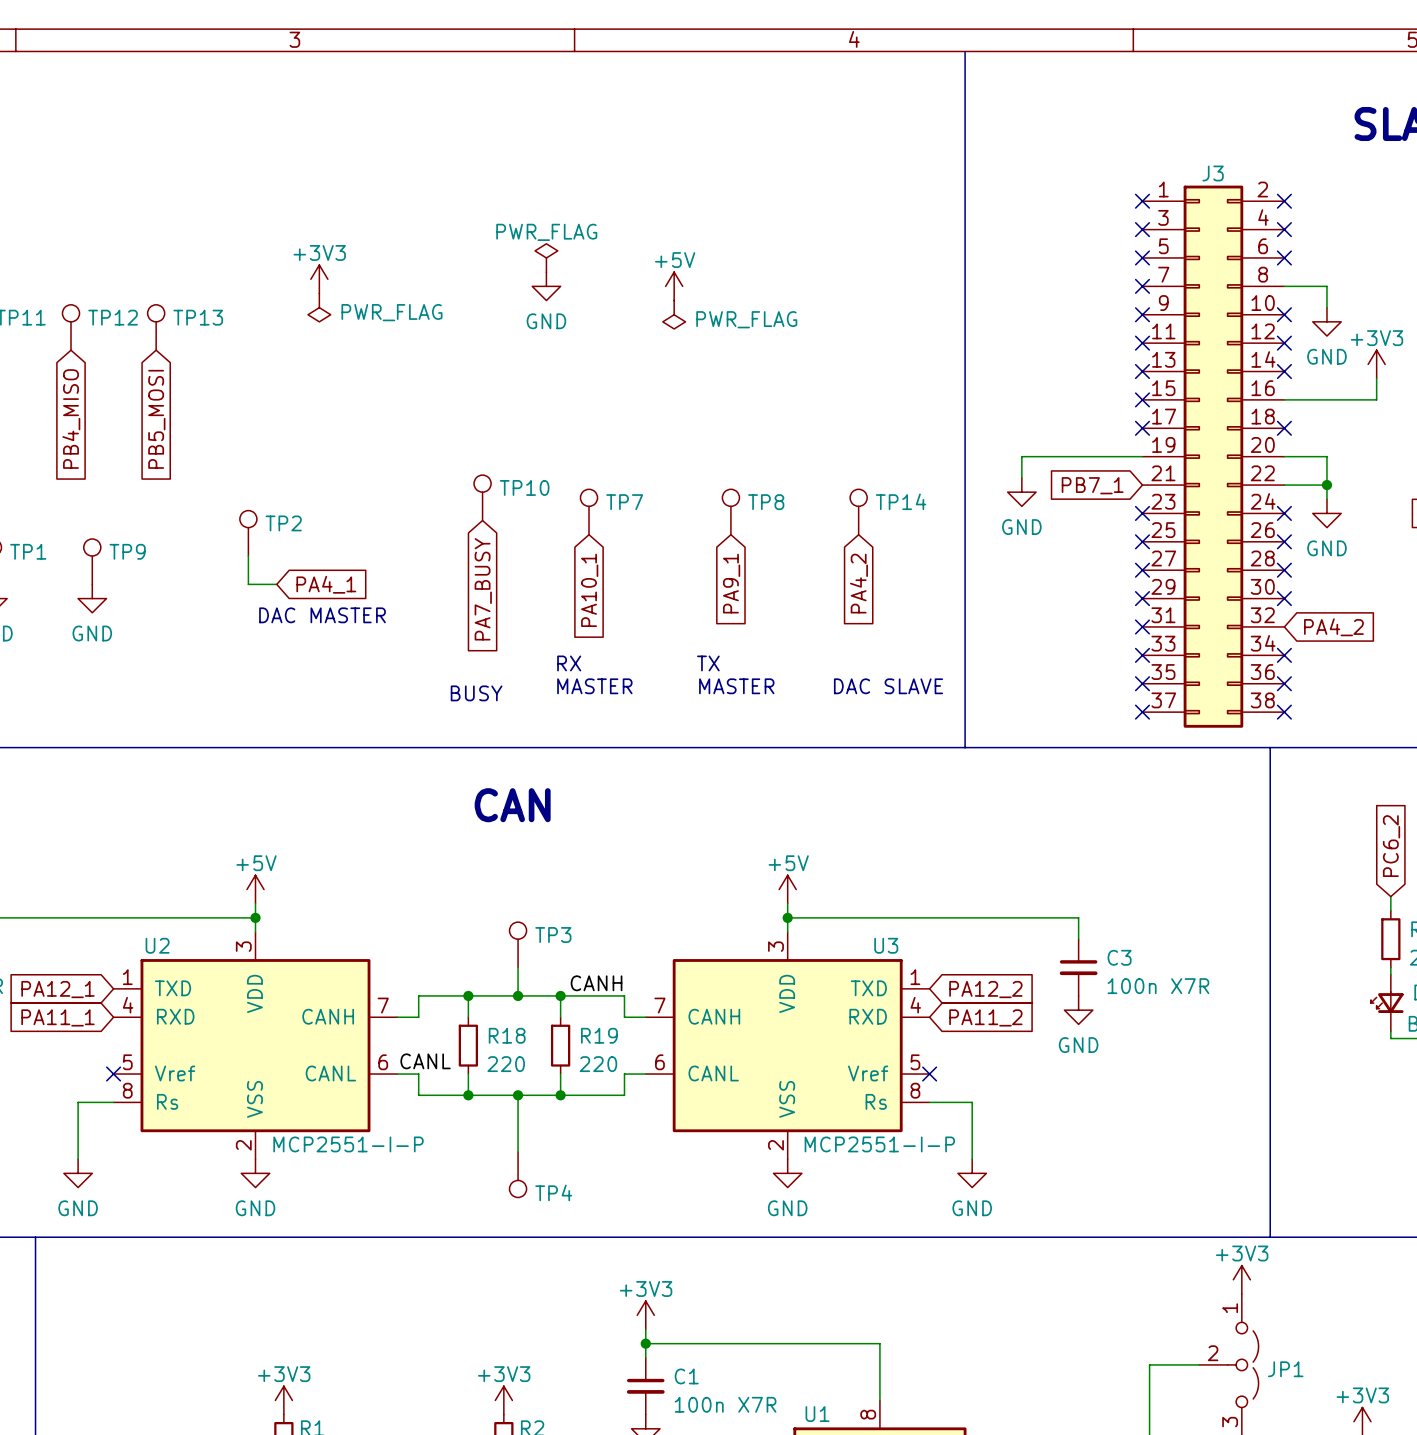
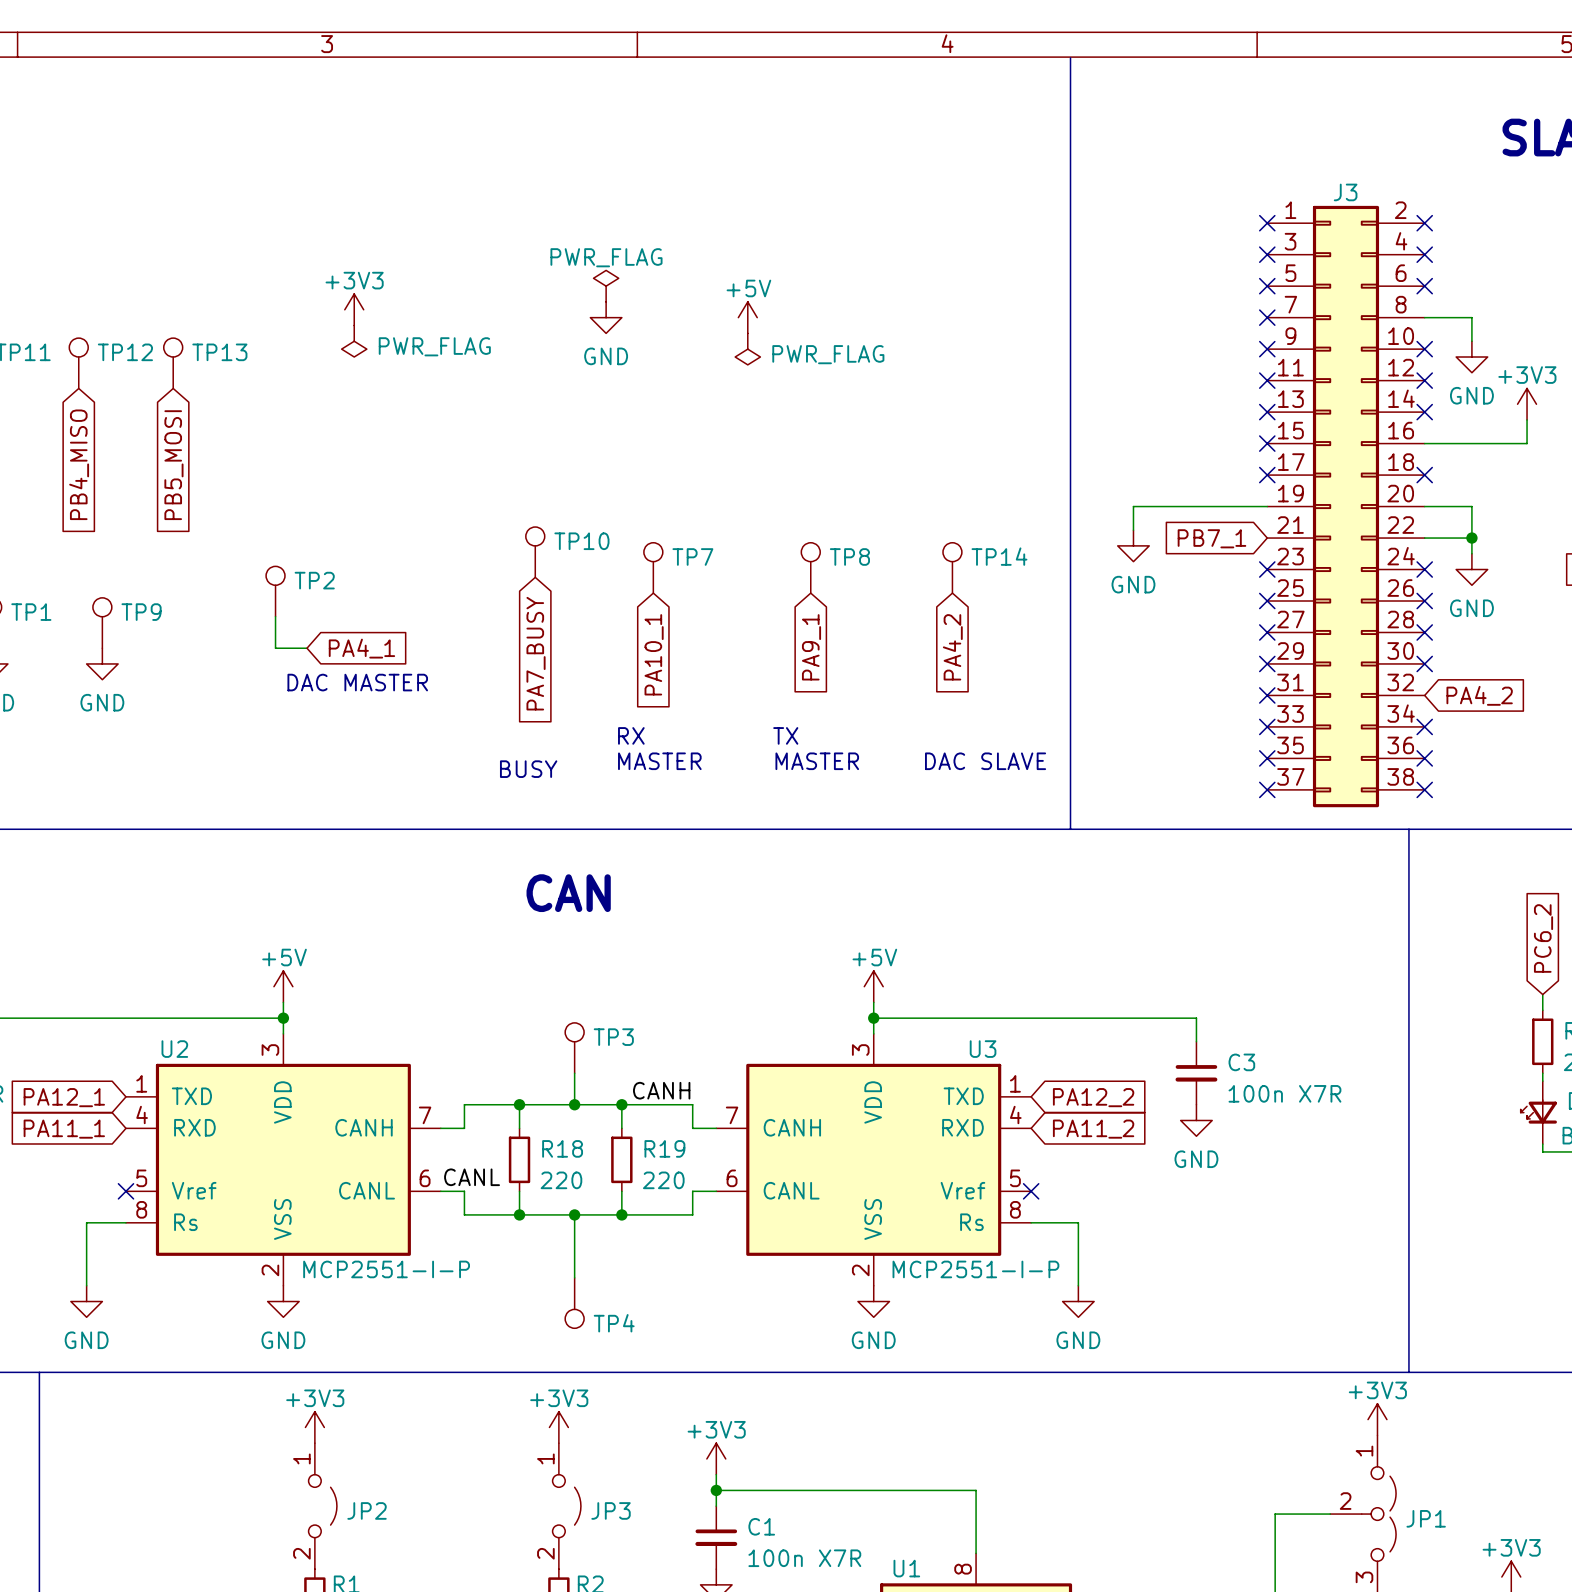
JP2: none -> (322, 1506)
JP3: none -> (566, 1506)
power symbol position: +3V3 (283, 1400) -> +3V3 (314, 1427)
power symbol position: +3V3 (503, 1400) -> +3V3 (558, 1427)

